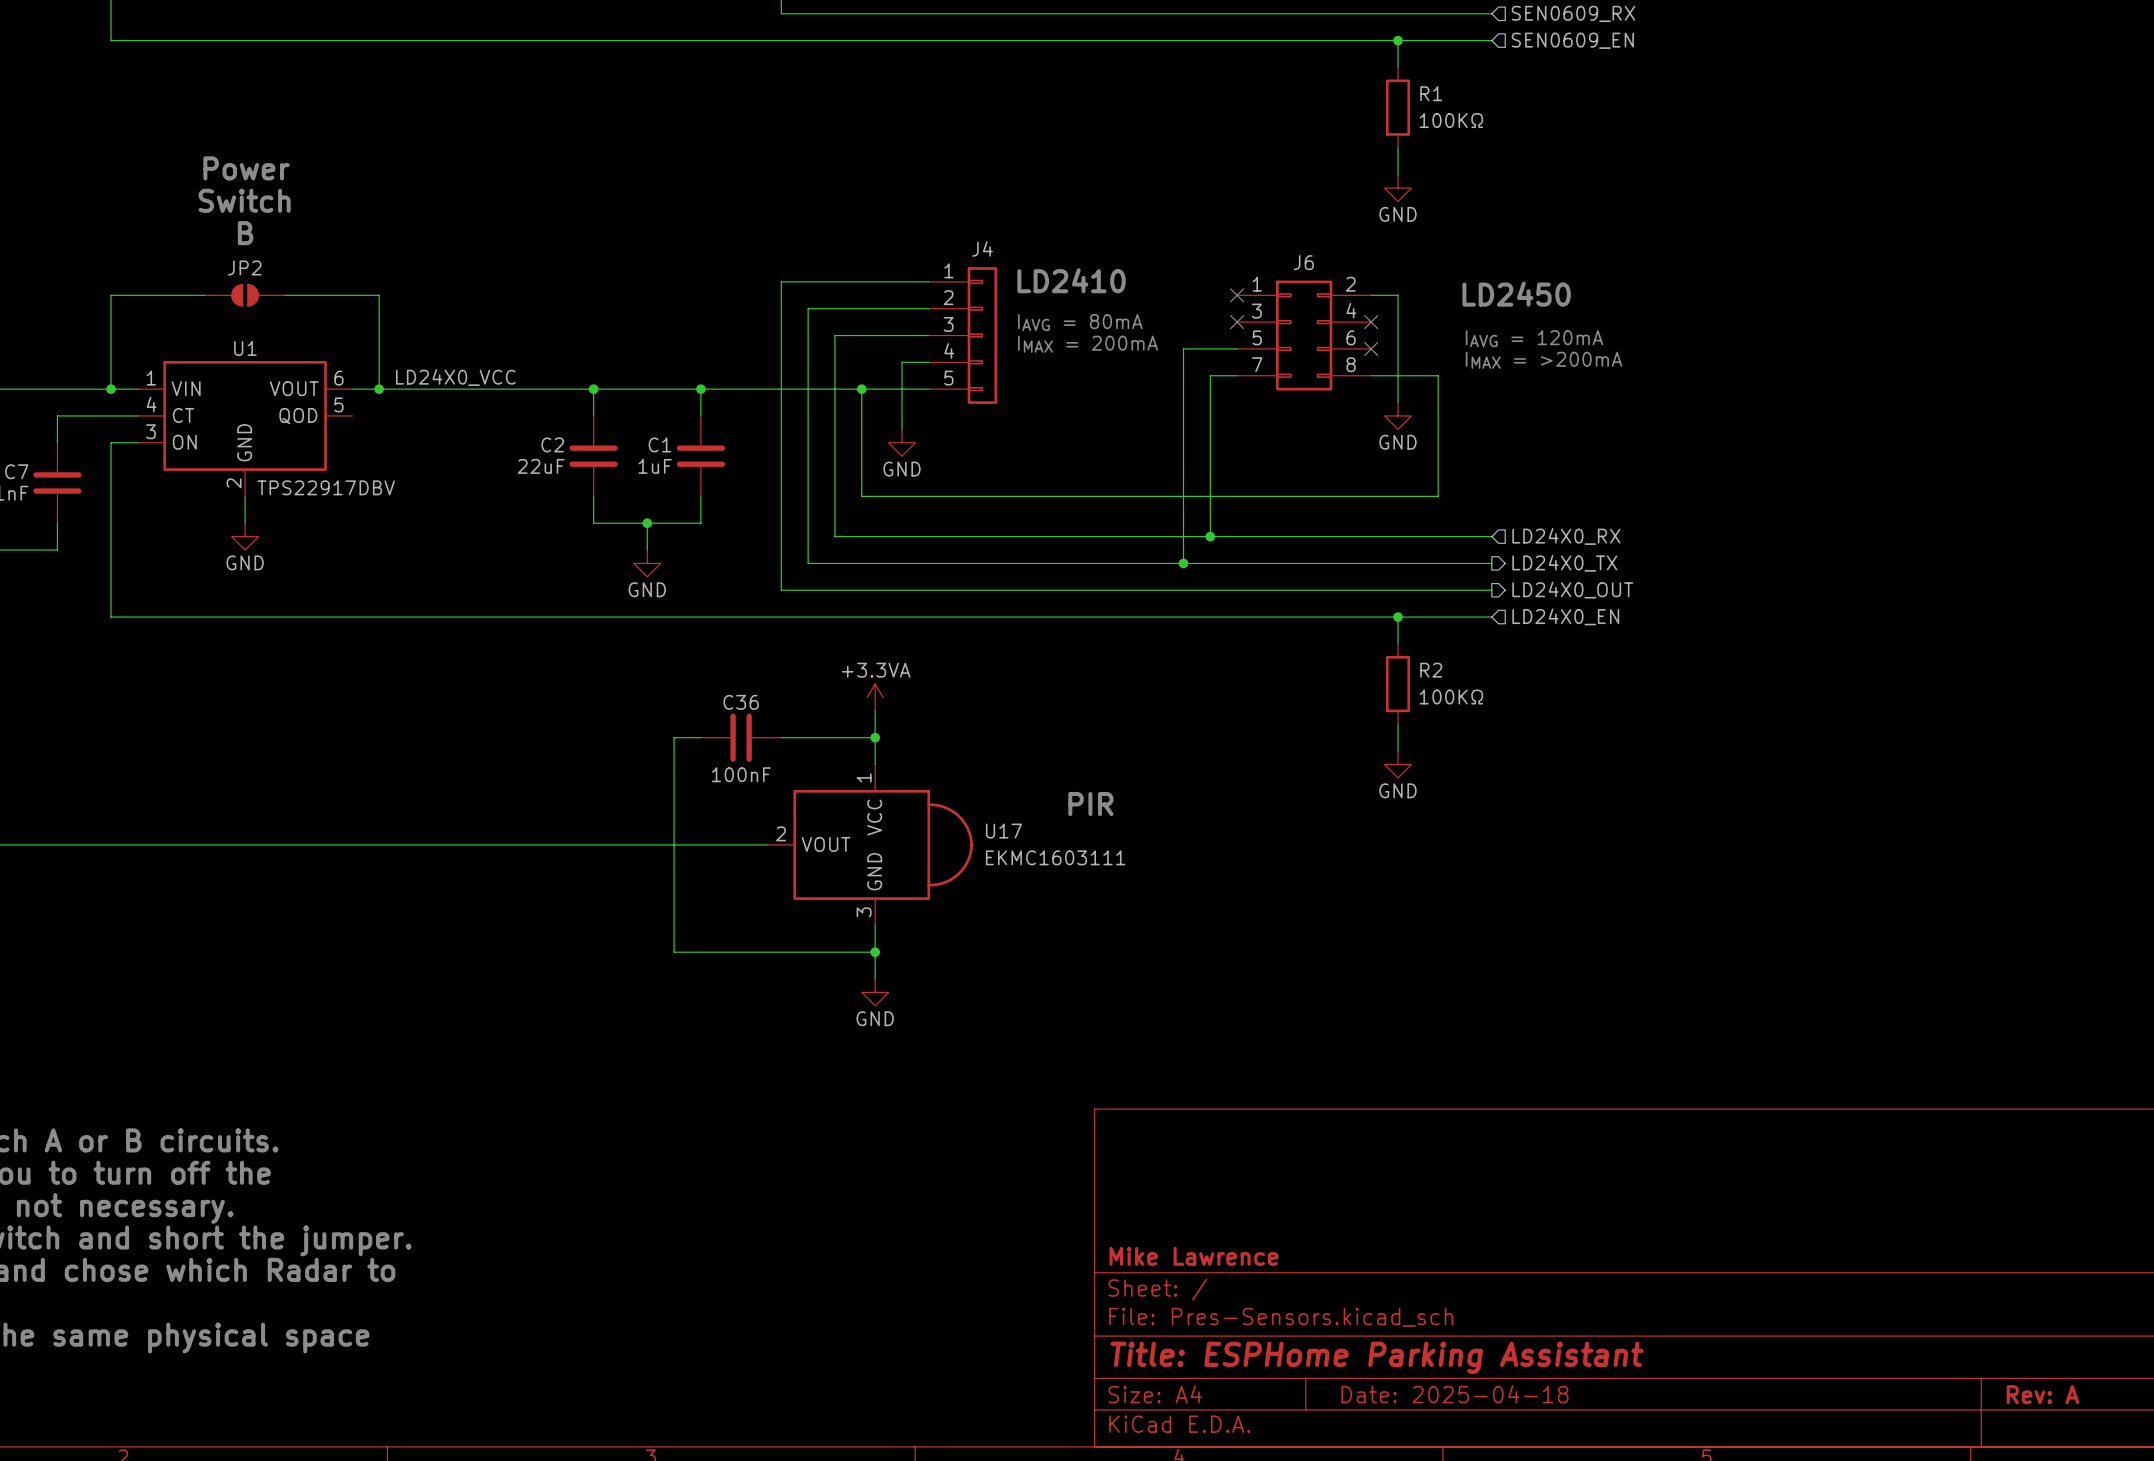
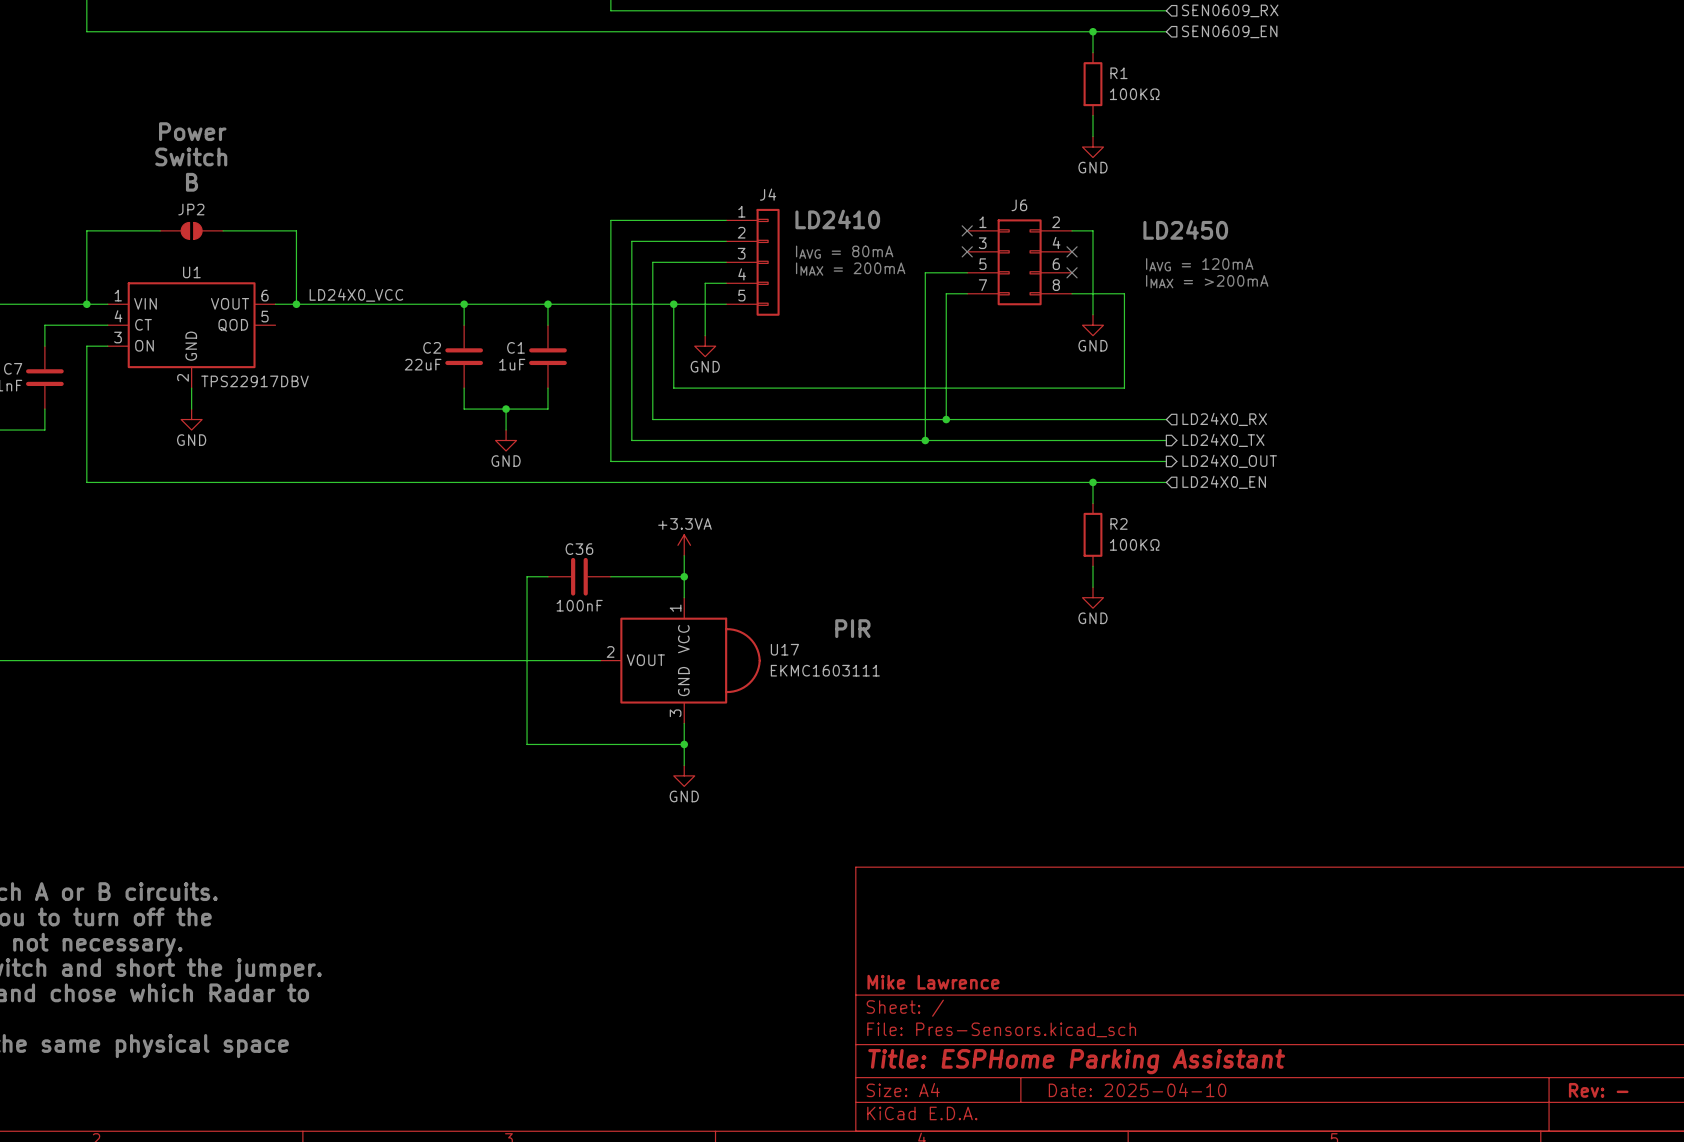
title block: Date: 2025-04-18 (1454, 1394) -> Date: 2025-04-10 (1137, 1090)
title block: Rev: A (2042, 1394) -> Rev: - (1598, 1090)

